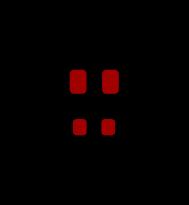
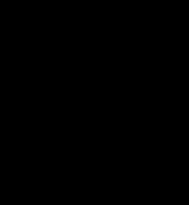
part: (94, 81) -> none
part: (94, 127) -> none

